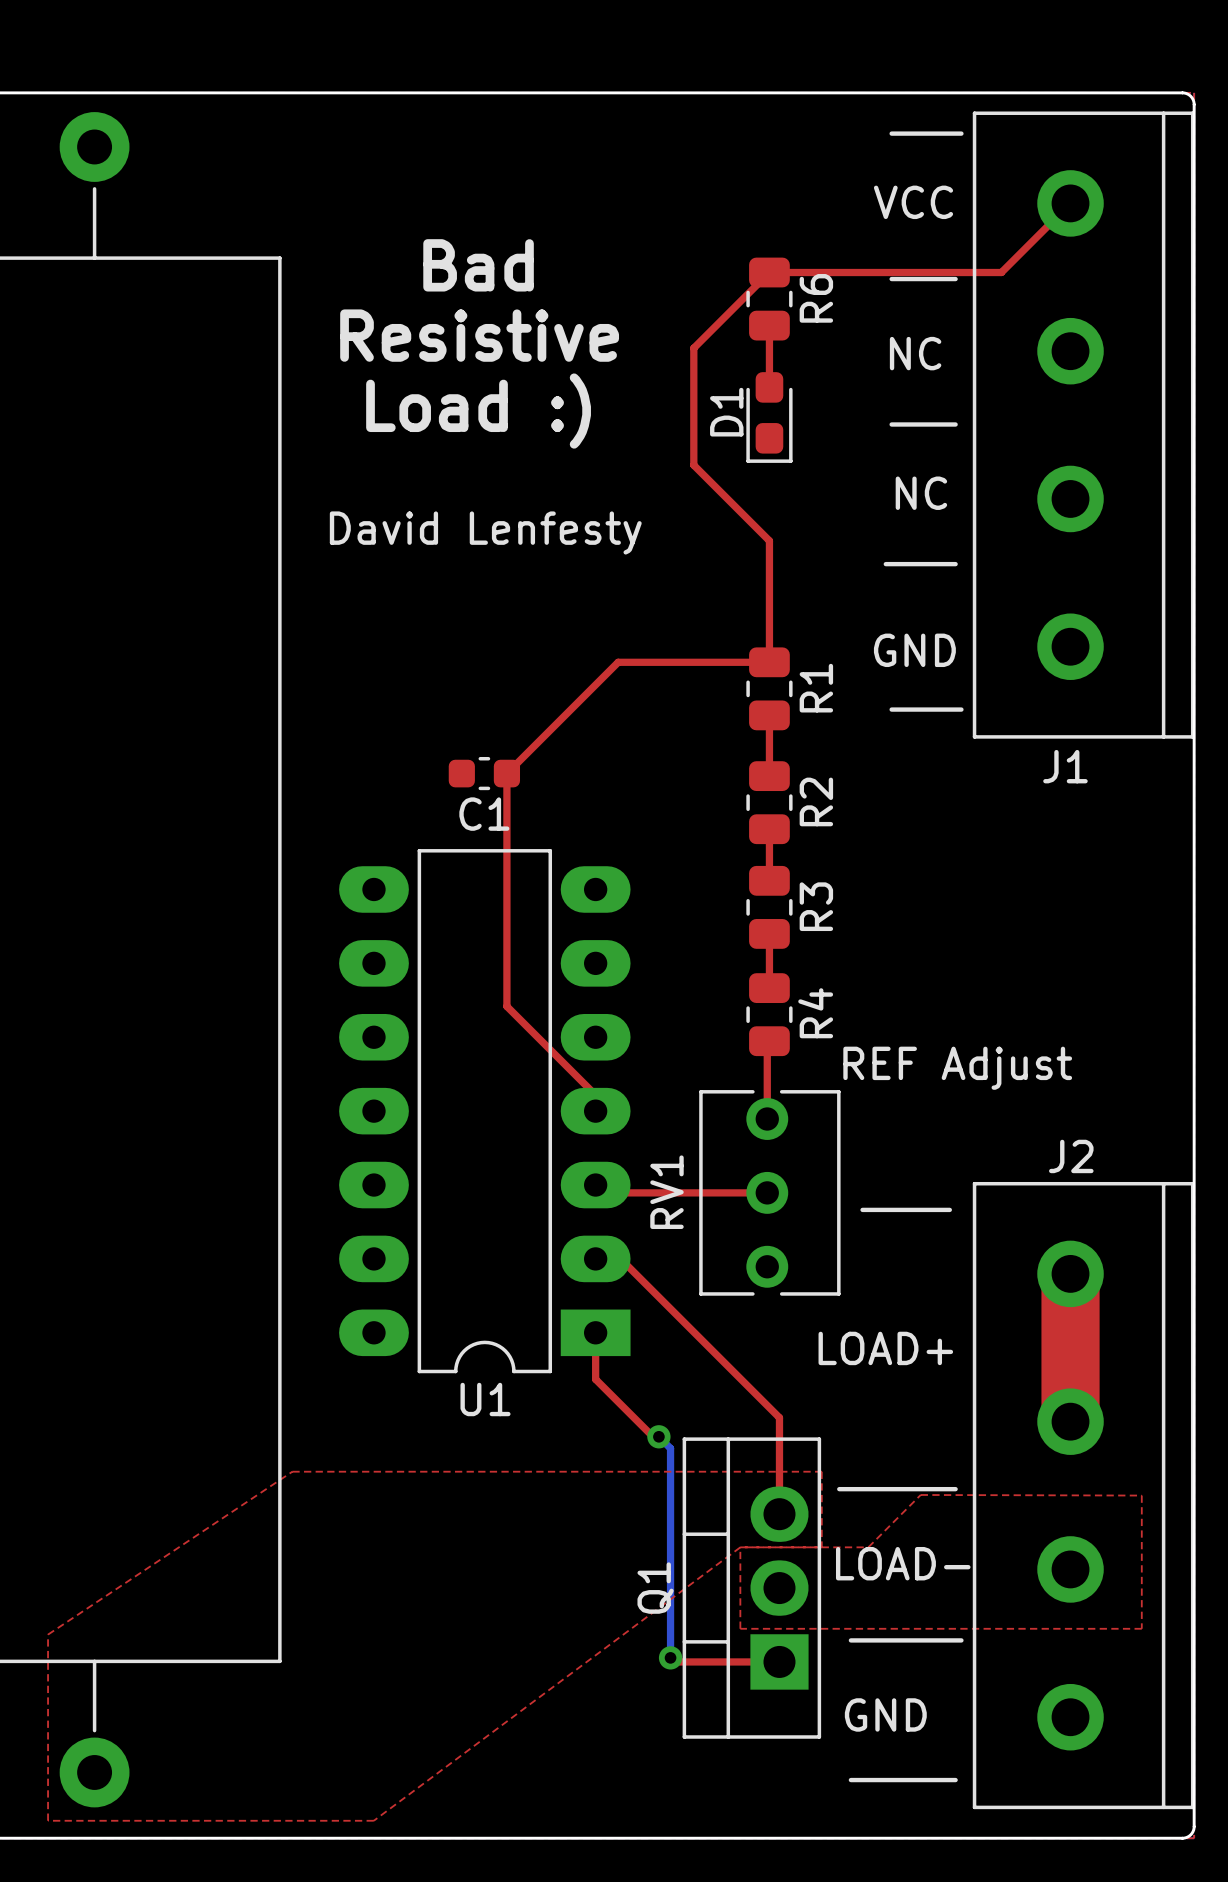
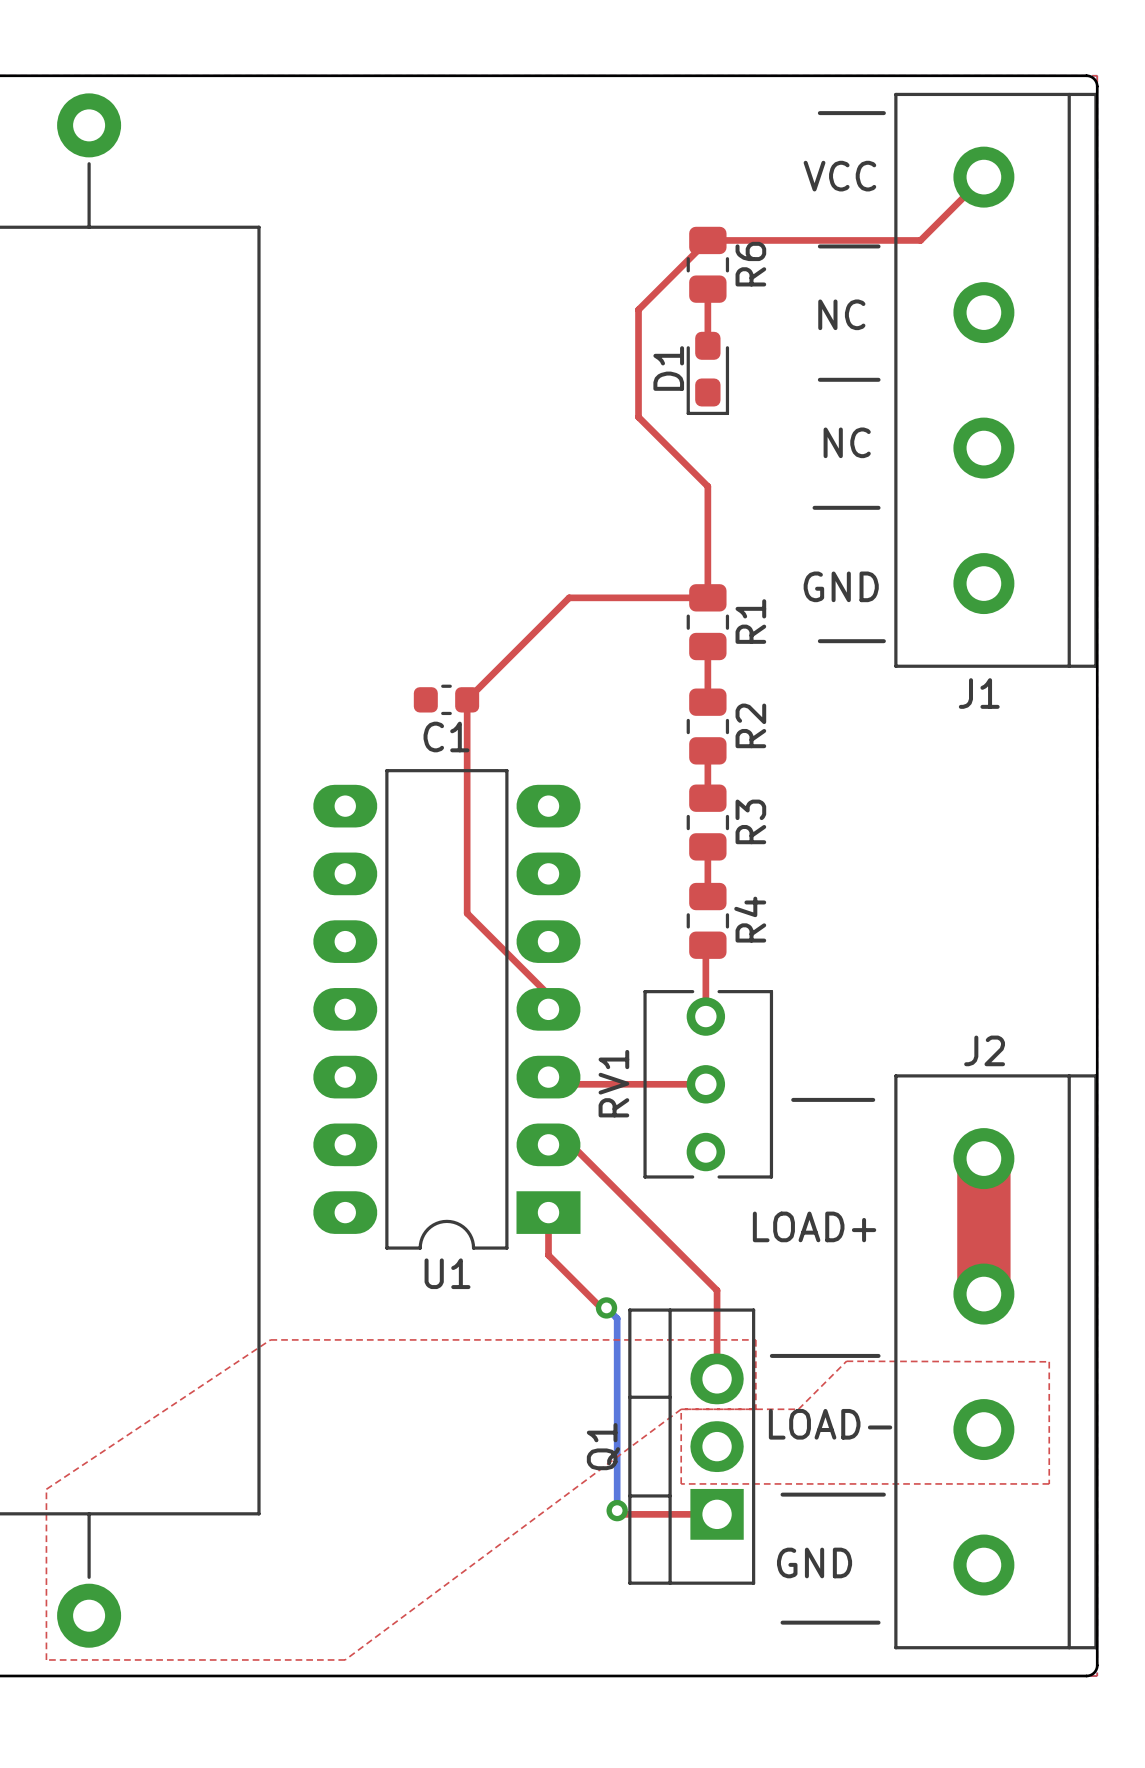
text: Bad (478, 265) -> none
text: Resistive (479, 335) -> none
text: Load :) (478, 411) -> none
text: David Lenfesty (485, 532) -> none
text: REF Adjust (957, 1068) -> none

